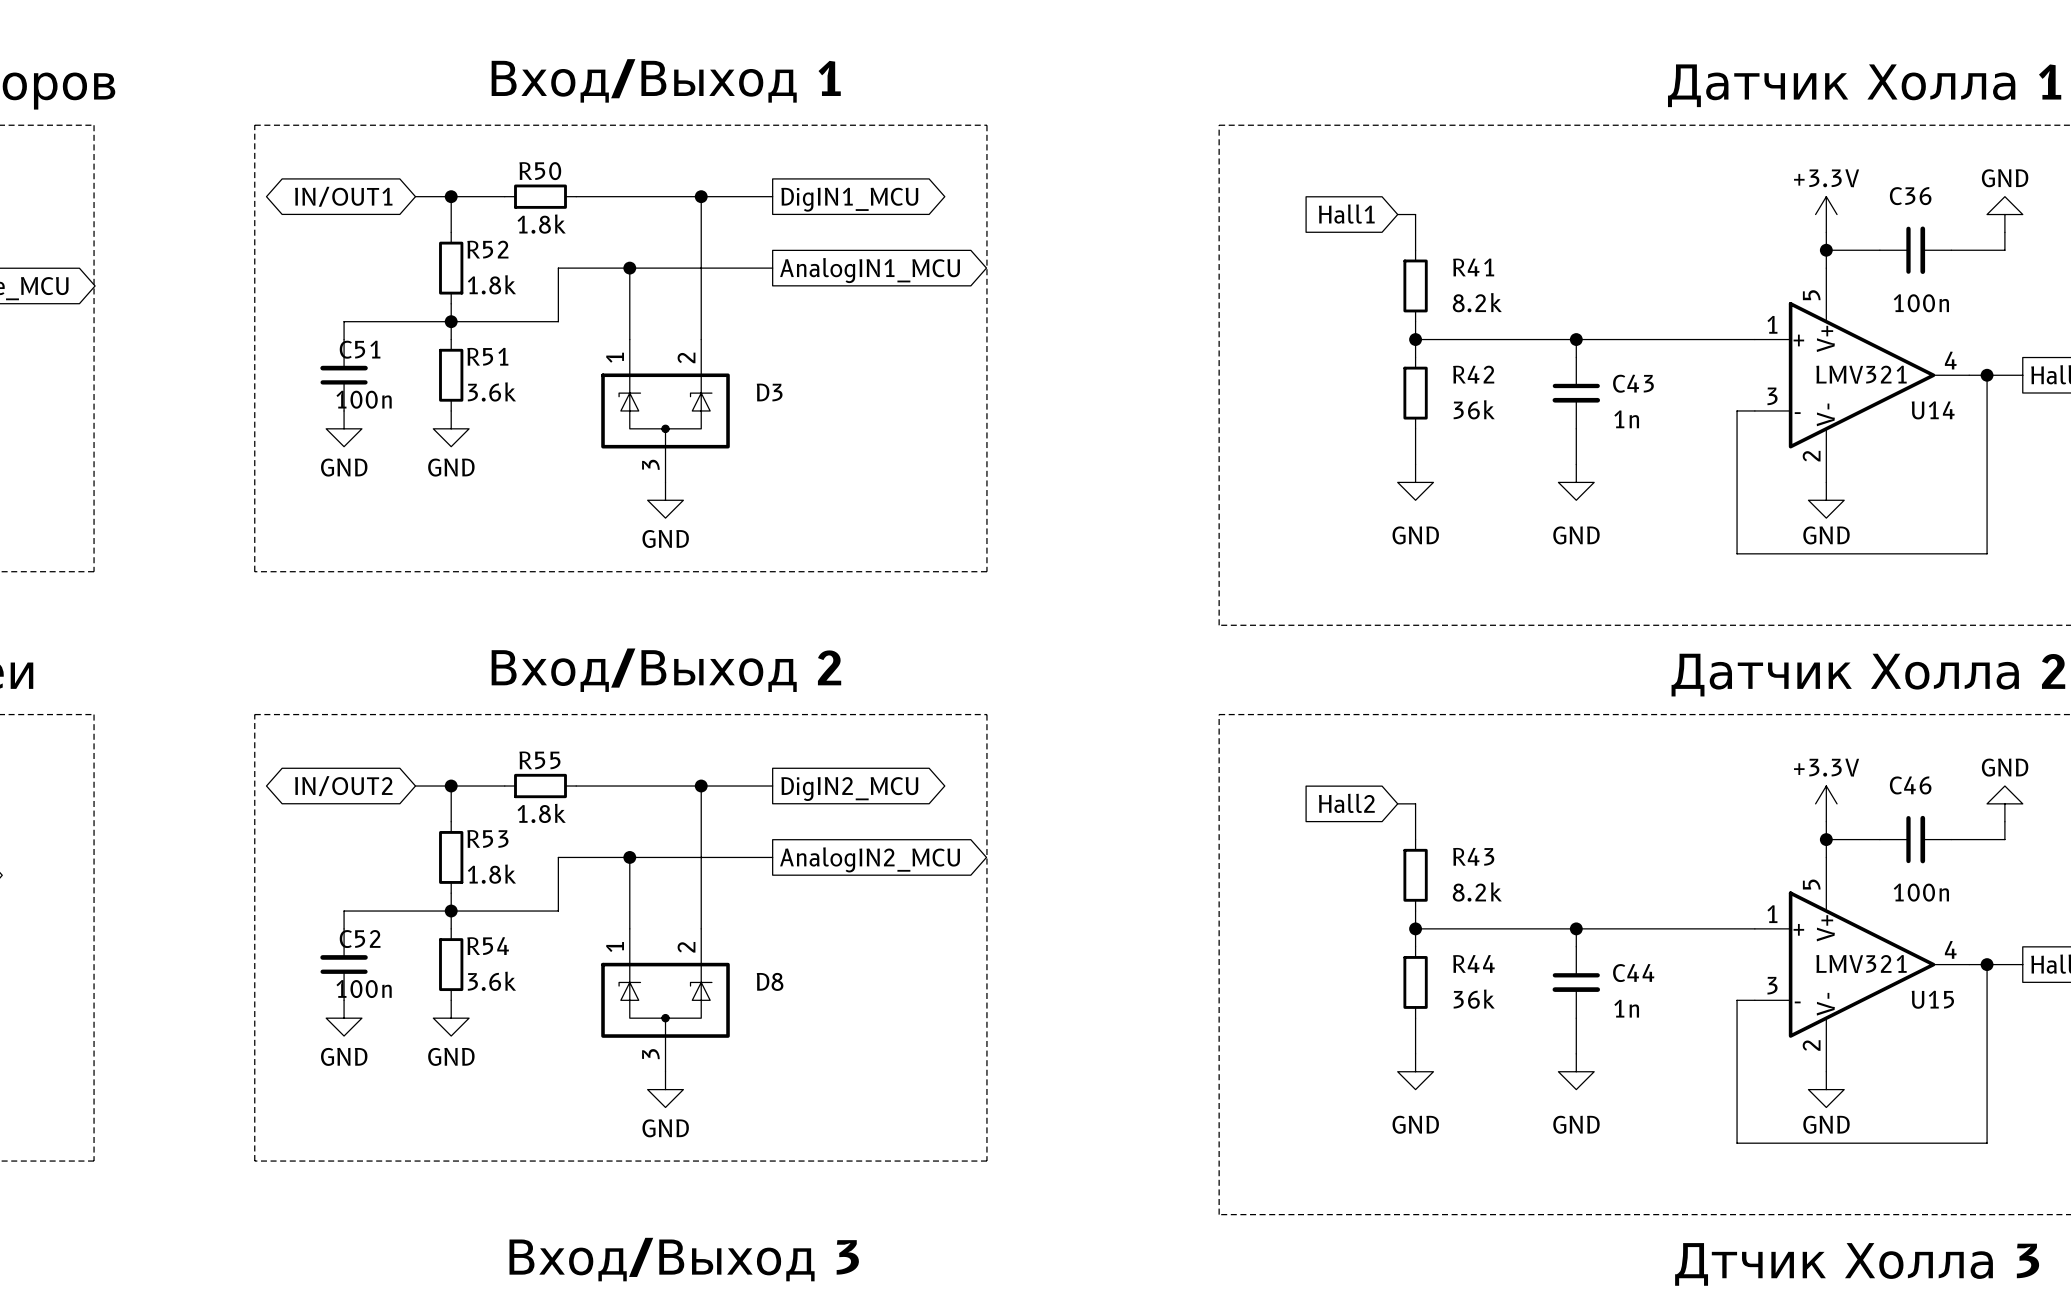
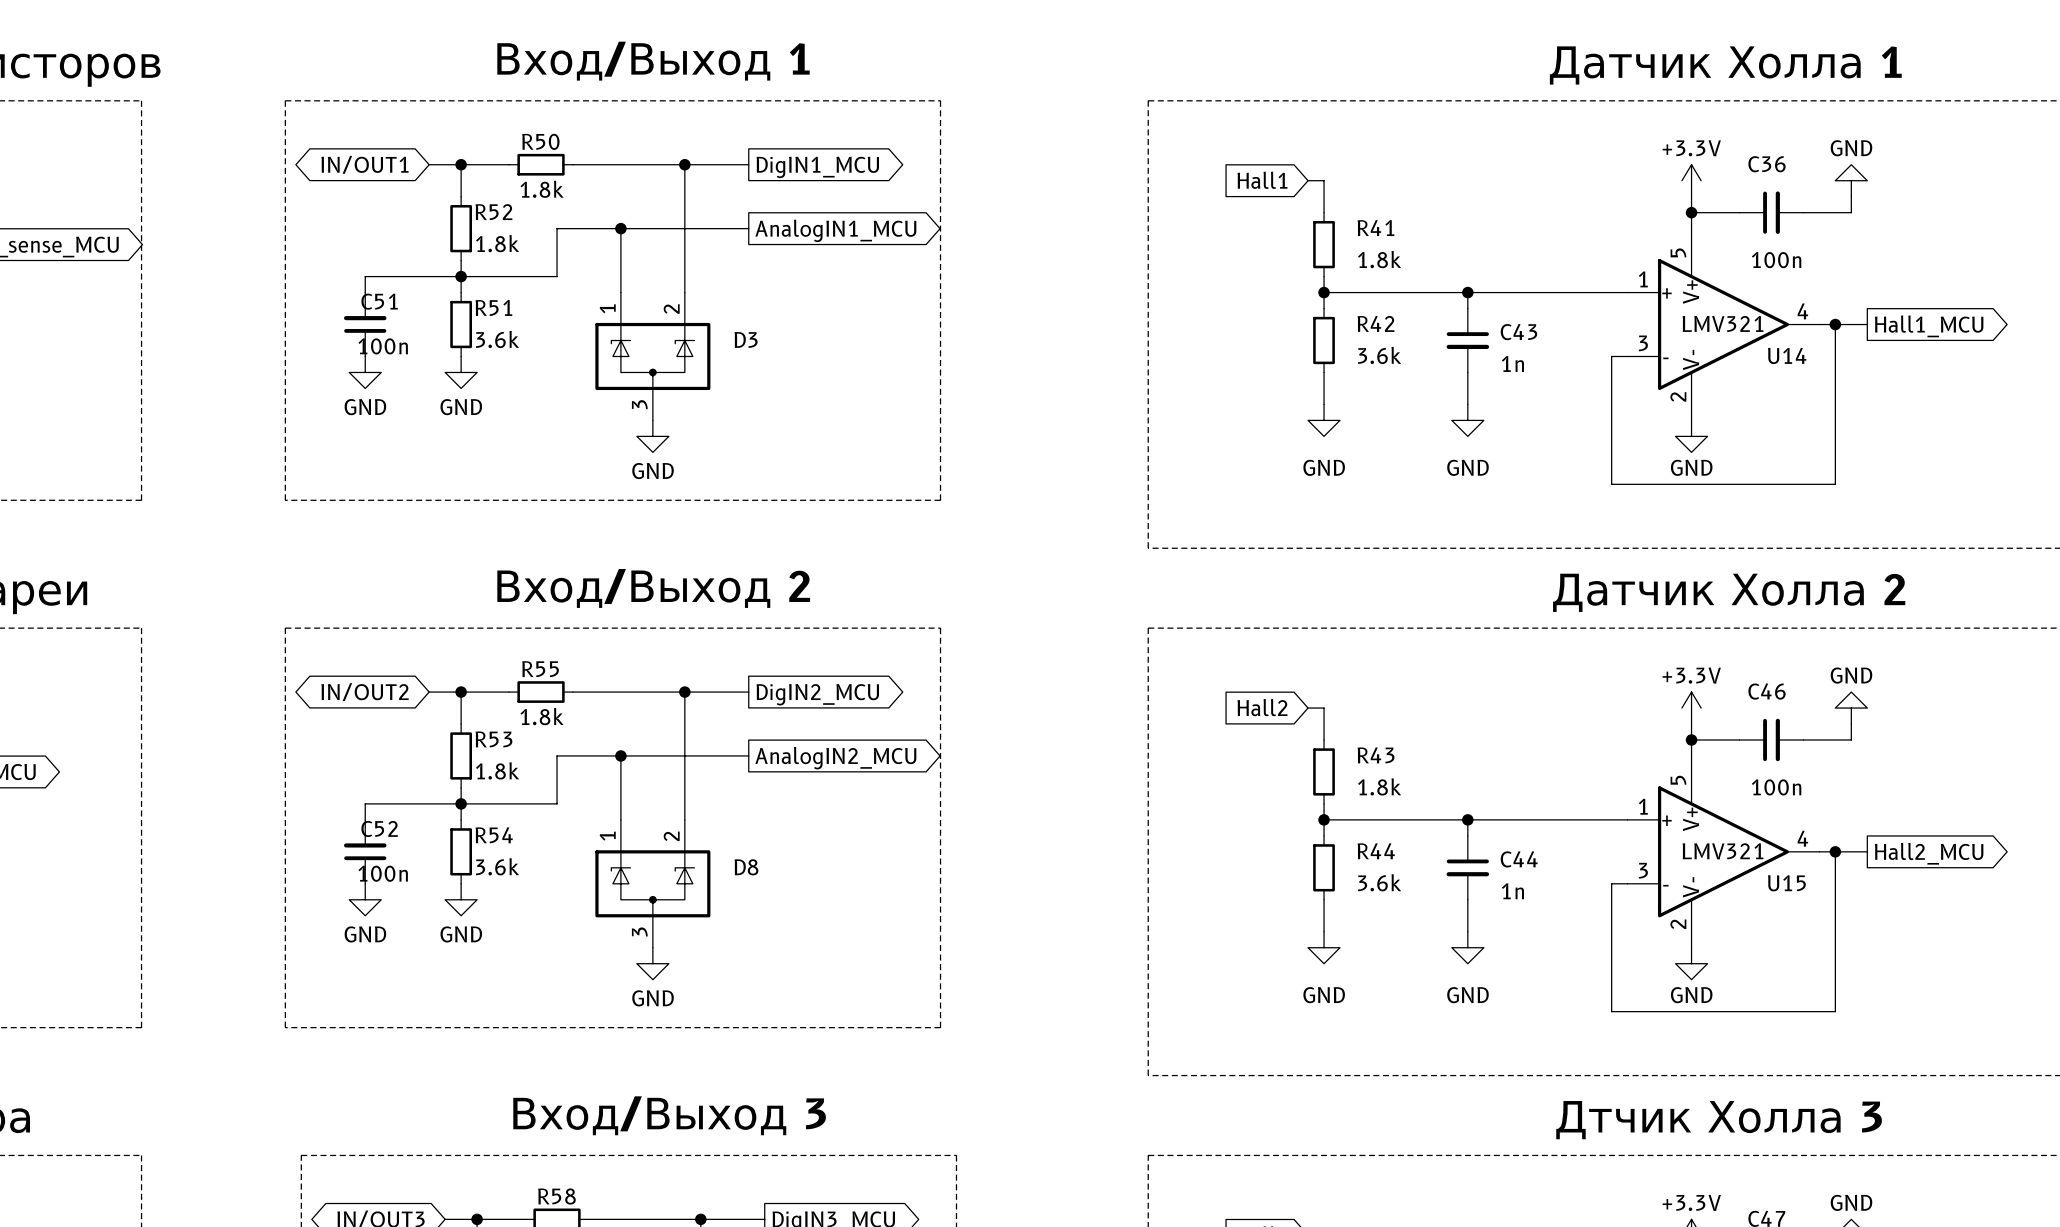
R41 value: 8.2k (1477, 302) -> 1.8k (1379, 259)
R42 value: 36k (1474, 409) -> 3.6k (1379, 355)
R43 value: 8.2k (1477, 892) -> 1.8k (1379, 786)
R44 value: 36k (1474, 999) -> 3.6k (1379, 882)

